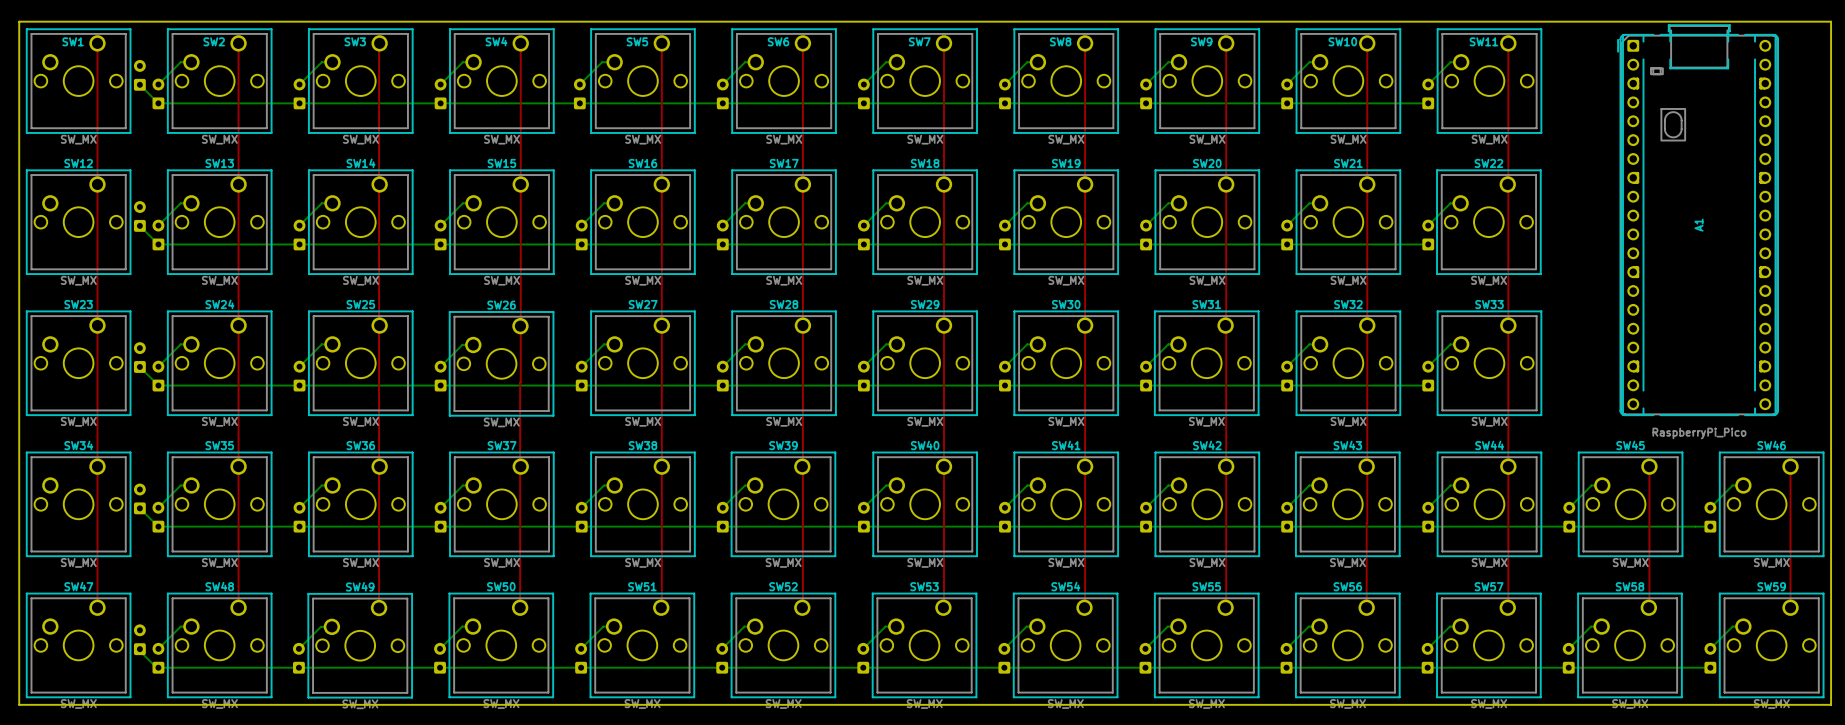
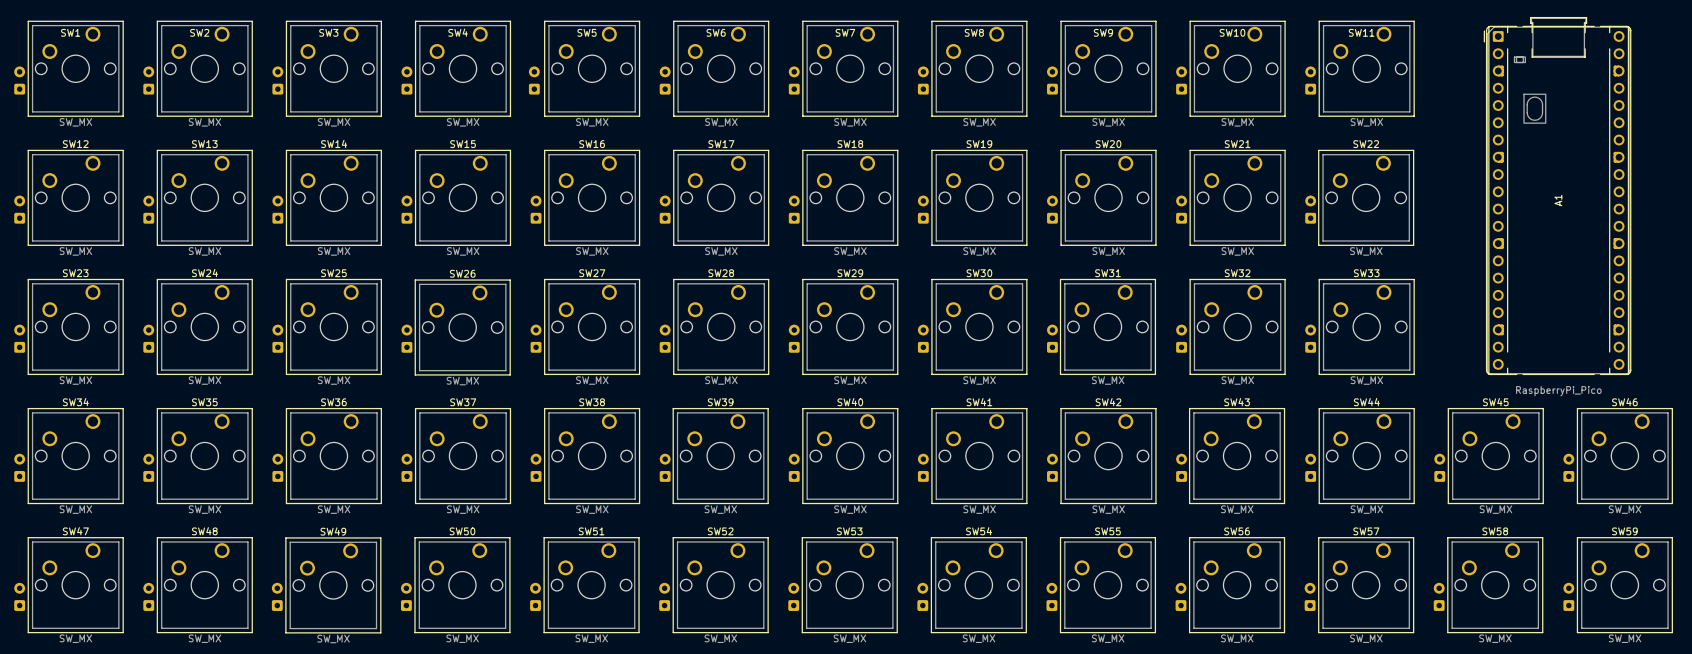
board edge: (19, 21) (1831, 21) (1831, 704) (19, 704) (19, 21) -> none
top track: (97, 43) (97, 607) -> none
top track: (238, 43) (238, 607) -> none
top track: (379, 43) (379, 608) -> none
top track: (520, 43) (520, 607) -> none
top track: (661, 43) (661, 607) -> none
top track: (802, 43) (802, 607) -> none
top track: (944, 43) (943, 607) -> none
top track: (1085, 43) (1084, 607) -> none
top track: (1226, 43) (1225, 607) -> none
top track: (1367, 43) (1366, 607) -> none
top track: (1508, 43) (1507, 607) -> none
bottom track: (191, 62) (180, 62) (158, 84) -> none
bottom track: (332, 62) (321, 62) (299, 84) -> none
bottom track: (473, 62) (462, 62) (440, 84) -> none
bottom track: (614, 62) (602, 62) (579, 84) -> none
bottom track: (755, 62) (745, 62) (722, 84) -> none
bottom track: (896, 62) (886, 62) (863, 84) -> none
bottom track: (1037, 62) (1027, 62) (1004, 84) -> none
bottom track: (1179, 62) (1168, 62) (1146, 84) -> none
bottom track: (1320, 62) (1309, 62) (1287, 84) -> none
bottom track: (1461, 62) (1450, 62) (1428, 84) -> none
part: (139, 75) -> none
bottom track: (139, 84) (158, 103) (1428, 103) -> none
part: none -> (19, 80)
bottom track: (191, 203) (180, 203) (158, 225) -> none
bottom track: (332, 203) (321, 203) (299, 225) -> none
bottom track: (473, 203) (462, 203) (440, 225) -> none
bottom track: (614, 203) (603, 203) (581, 225) -> none
bottom track: (755, 203) (745, 203) (722, 225) -> none
bottom track: (896, 203) (886, 203) (863, 225) -> none
bottom track: (1037, 203) (1027, 203) (1004, 225) -> none
bottom track: (1179, 203) (1168, 203) (1146, 225) -> none
bottom track: (1320, 203) (1309, 203) (1287, 225) -> none
bottom track: (1460, 203) (1450, 203) (1428, 225) -> none
part: (139, 216) -> none
bottom track: (139, 225) (158, 244) (1428, 244) -> none
part: none -> (19, 209)
bottom track: (191, 344) (180, 344) (158, 366) -> none
bottom track: (332, 344) (321, 344) (299, 366) -> none
bottom track: (473, 344) (462, 344) (440, 366) -> none
bottom track: (614, 344) (603, 344) (581, 366) -> none
bottom track: (755, 344) (745, 344) (722, 366) -> none
bottom track: (896, 344) (886, 344) (863, 366) -> none
bottom track: (1037, 344) (1027, 344) (1004, 366) -> none
bottom track: (1178, 344) (1168, 344) (1146, 366) -> none
bottom track: (1320, 344) (1309, 344) (1287, 366) -> none
bottom track: (1461, 344) (1450, 344) (1428, 366) -> none
part: (139, 357) -> none
bottom track: (139, 366) (158, 385) (1428, 385) -> none
part: none -> (19, 338)
top track: (1649, 466) (1648, 607) -> none
top track: (1790, 466) (1790, 607) -> none
bottom track: (191, 485) (180, 485) (158, 507) -> none
bottom track: (332, 485) (321, 485) (299, 507) -> none
bottom track: (473, 485) (462, 485) (440, 507) -> none
bottom track: (614, 485) (603, 485) (581, 507) -> none
bottom track: (755, 485) (745, 485) (722, 507) -> none
bottom track: (896, 485) (886, 485) (863, 507) -> none
bottom track: (1037, 485) (1027, 485) (1004, 507) -> none
bottom track: (1179, 485) (1168, 485) (1146, 507) -> none
bottom track: (1319, 485) (1309, 485) (1287, 507) -> none
bottom track: (1461, 485) (1450, 485) (1428, 507) -> none
bottom track: (1602, 485) (1591, 485) (1569, 507) -> none
bottom track: (1743, 485) (1732, 485) (1710, 507) -> none
part: (139, 498) -> none
bottom track: (139, 508) (158, 526) (1710, 526) -> none
part: none -> (19, 467)
bottom track: (191, 626) (180, 626) (158, 648) -> none
bottom track: (331, 626) (320, 626) (298, 648) -> none
bottom track: (472, 626) (462, 626) (440, 648) -> none
bottom track: (614, 626) (603, 626) (581, 648) -> none
bottom track: (755, 626) (744, 626) (722, 648) -> none
bottom track: (896, 626) (885, 626) (863, 648) -> none
bottom track: (1037, 626) (1026, 626) (1004, 648) -> none
bottom track: (1178, 626) (1167, 626) (1145, 648) -> none
bottom track: (1319, 626) (1308, 626) (1286, 648) -> none
bottom track: (1460, 626) (1449, 626) (1427, 648) -> none
bottom track: (1601, 626) (1590, 626) (1568, 648) -> none
bottom track: (1743, 626) (1732, 626) (1710, 648) -> none
part: (139, 639) -> none
bottom track: (139, 649) (156, 667) (1710, 667) -> none
part: none -> (19, 596)

